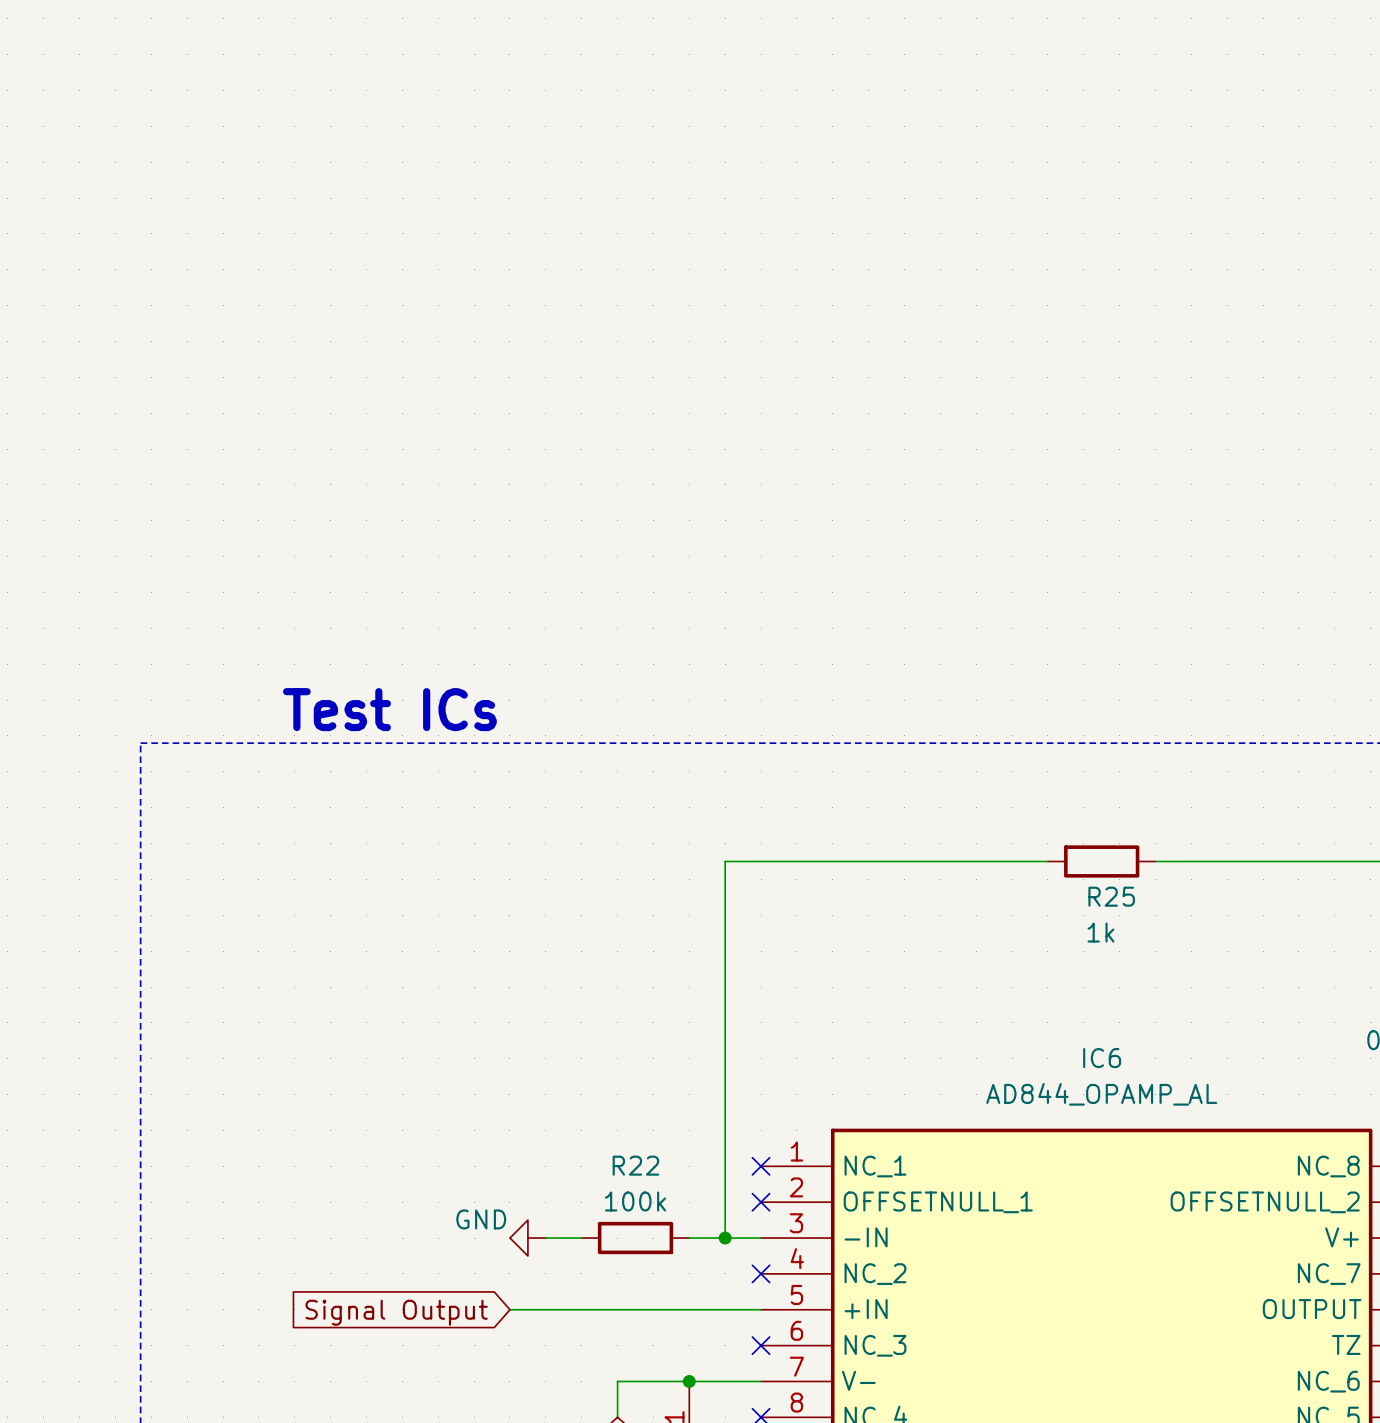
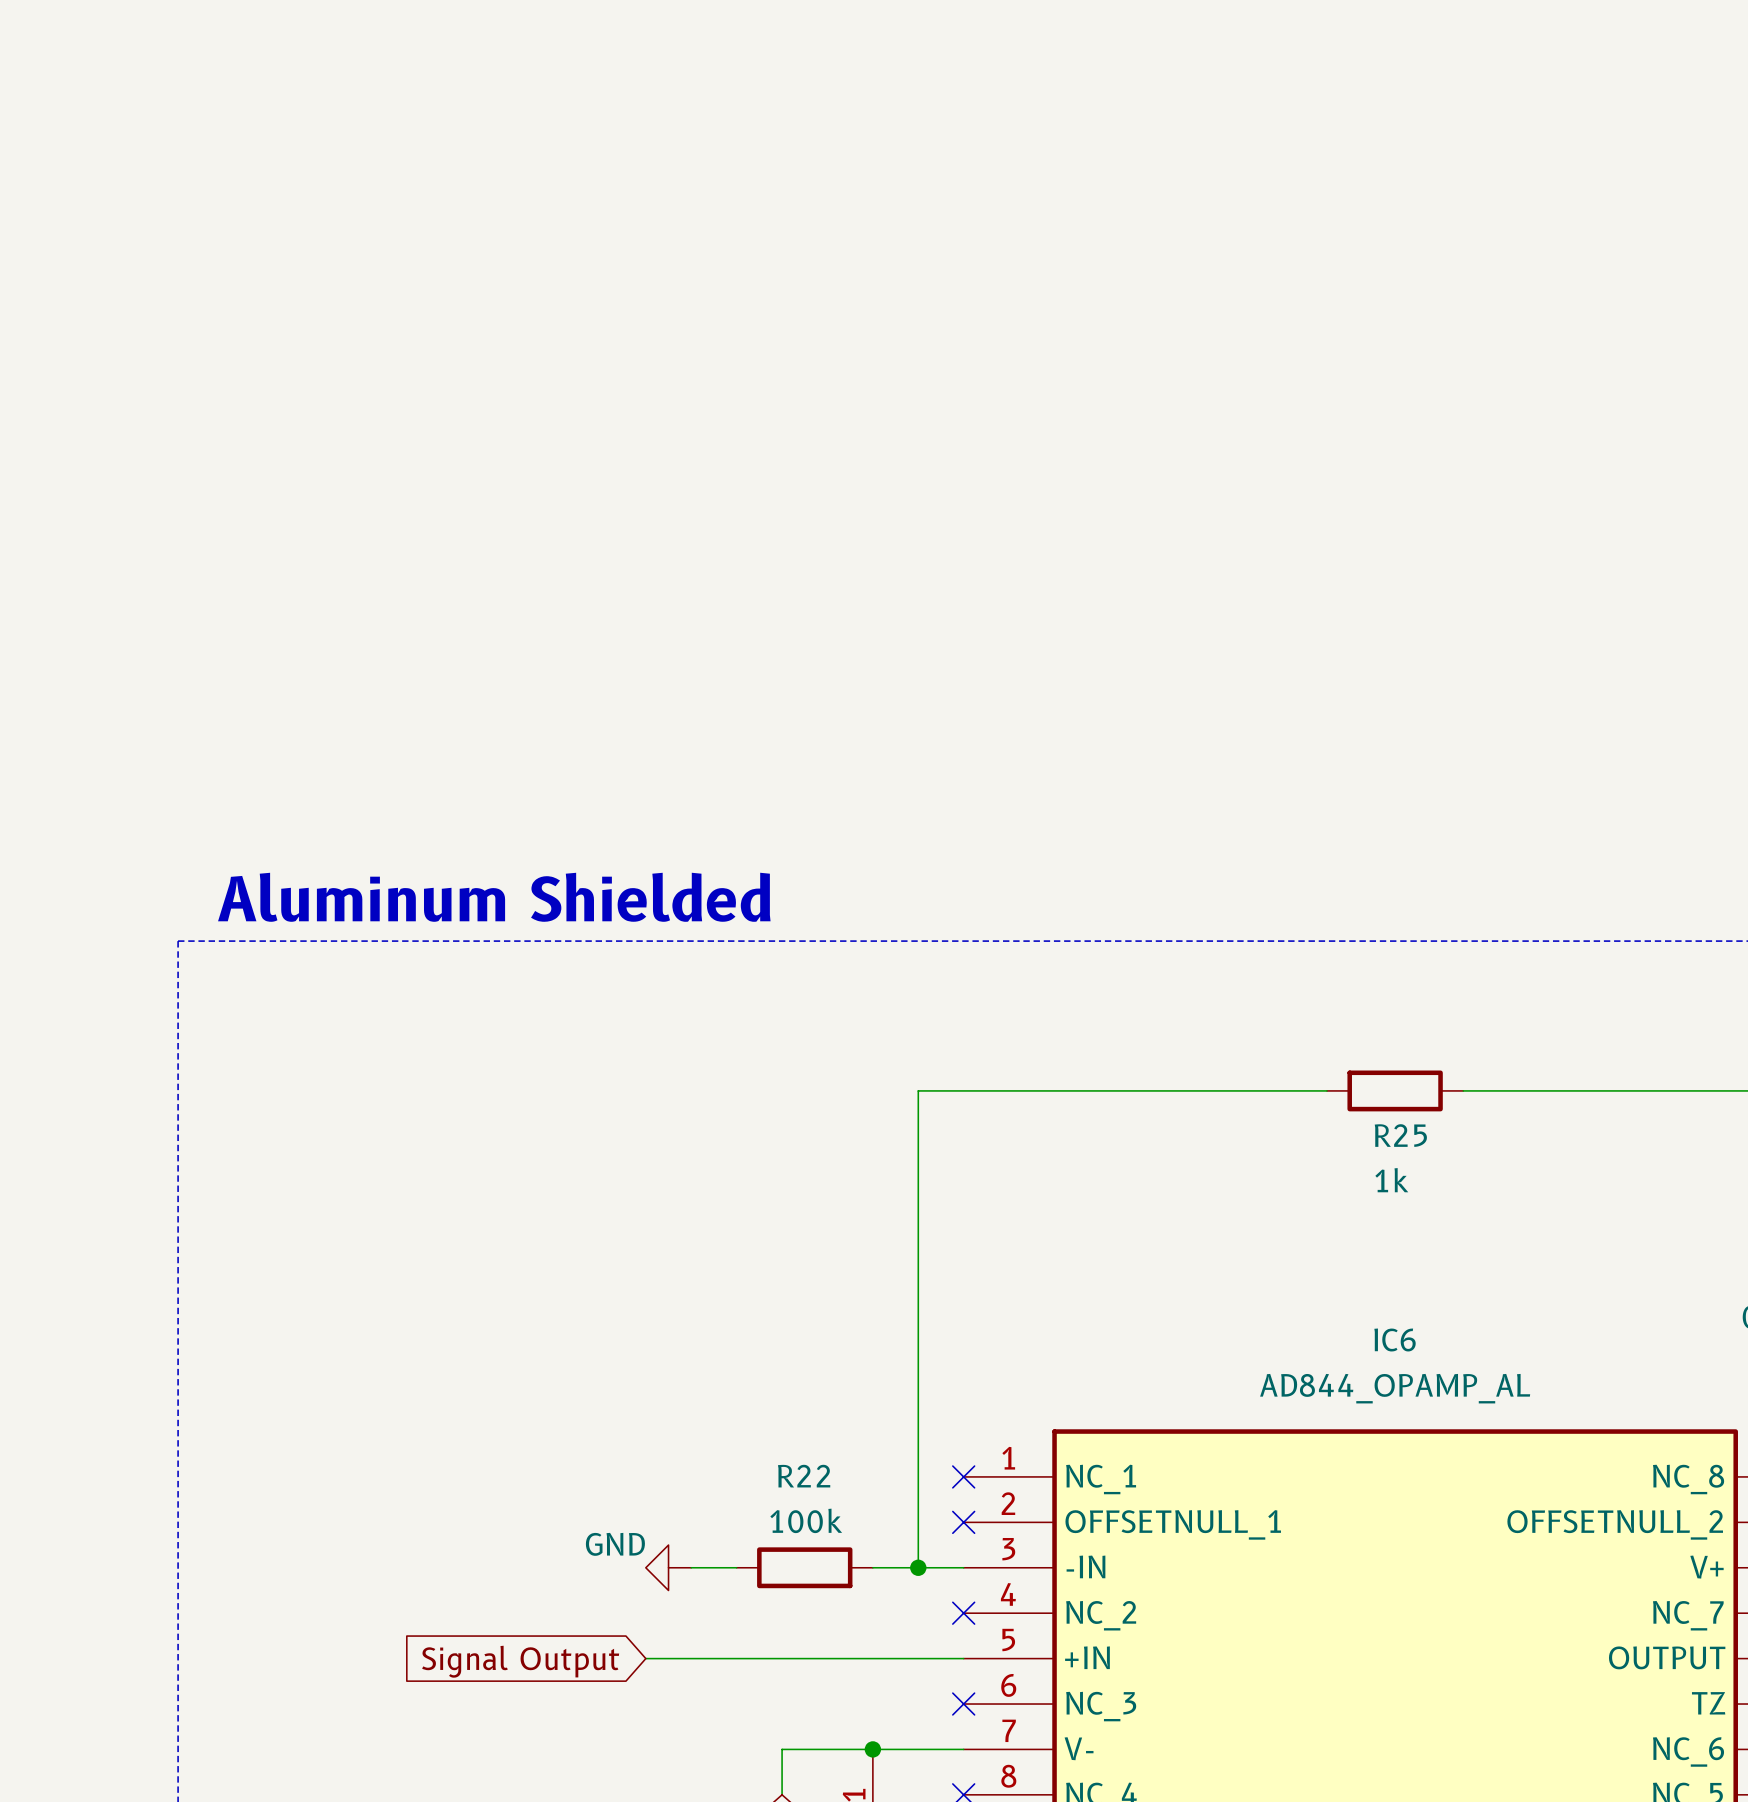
text: Test ICs (389, 709) -> Aluminum Shielded (494, 897)

